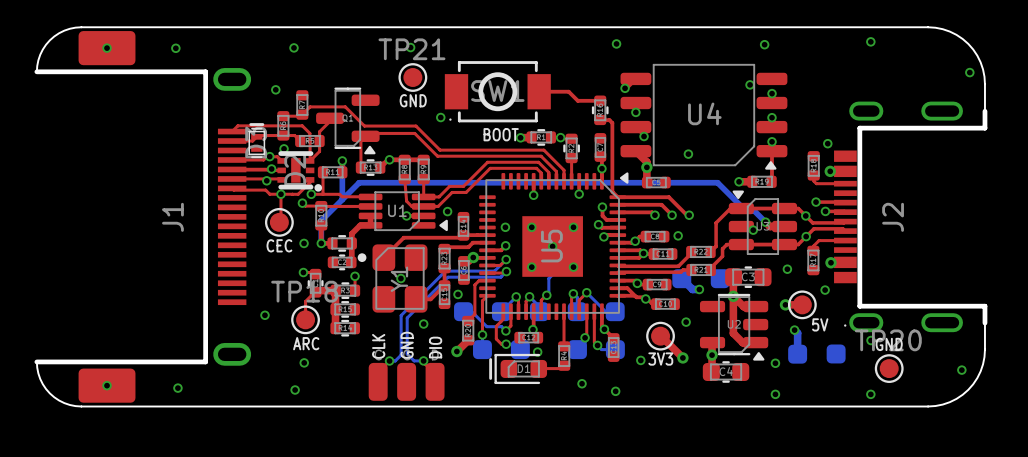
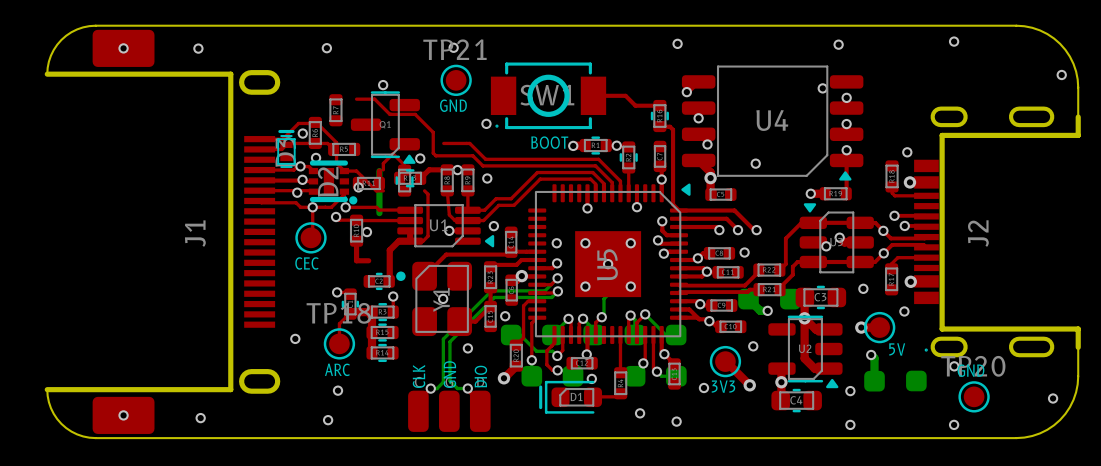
via: none -> (383, 85)
via: (275, 89) -> none
top track: (283, 116) (300, 116) (310, 106) (345, 106) (364, 126) (415, 126) (425, 135) -> (443, 143) (469, 143)
top track: (330, 118) (330, 121) (319, 131) (319, 151) (310, 160) (310, 141) -> none
via: none -> (302, 133)
top track: (232, 131) (237, 125) (302, 125) (309, 133) (309, 141) -> (259, 139) (282, 139) (298, 123) (317, 123) (336, 142) (336, 163) (344, 171) (356, 171) (376, 190) (383, 190)
top track: (365, 136) (368, 133) (414, 133) (428, 146) -> (356, 99) (374, 99) (389, 114) (415, 114) (433, 132) (433, 153) (435, 155) (472, 155)
top track: (365, 136) (360, 141) (360, 167) -> none
via: none -> (420, 158)
top track: none -> (383, 169) (383, 163) (393, 153) (404, 165) (404, 170)
via: (389, 159) -> none
via: none -> (457, 170)
via: (342, 160) -> none
via: none -> (487, 178)
top track: (323, 172) (323, 194) -> none
via: none -> (358, 187)
top track: none -> (424, 190) (428, 194) (428, 236) (423, 241) (410, 241)
via: none -> (366, 232)
bottom track: (765, 222) (754, 210) (745, 210) (717, 182) (359, 182) (321, 220) (321, 243) -> none
via: (304, 243) -> none
via: (321, 243) -> none
part rotation: 0° (342, 243) -> 90° clockwise (404, 180)
part position: (342, 243) -> (404, 180)

